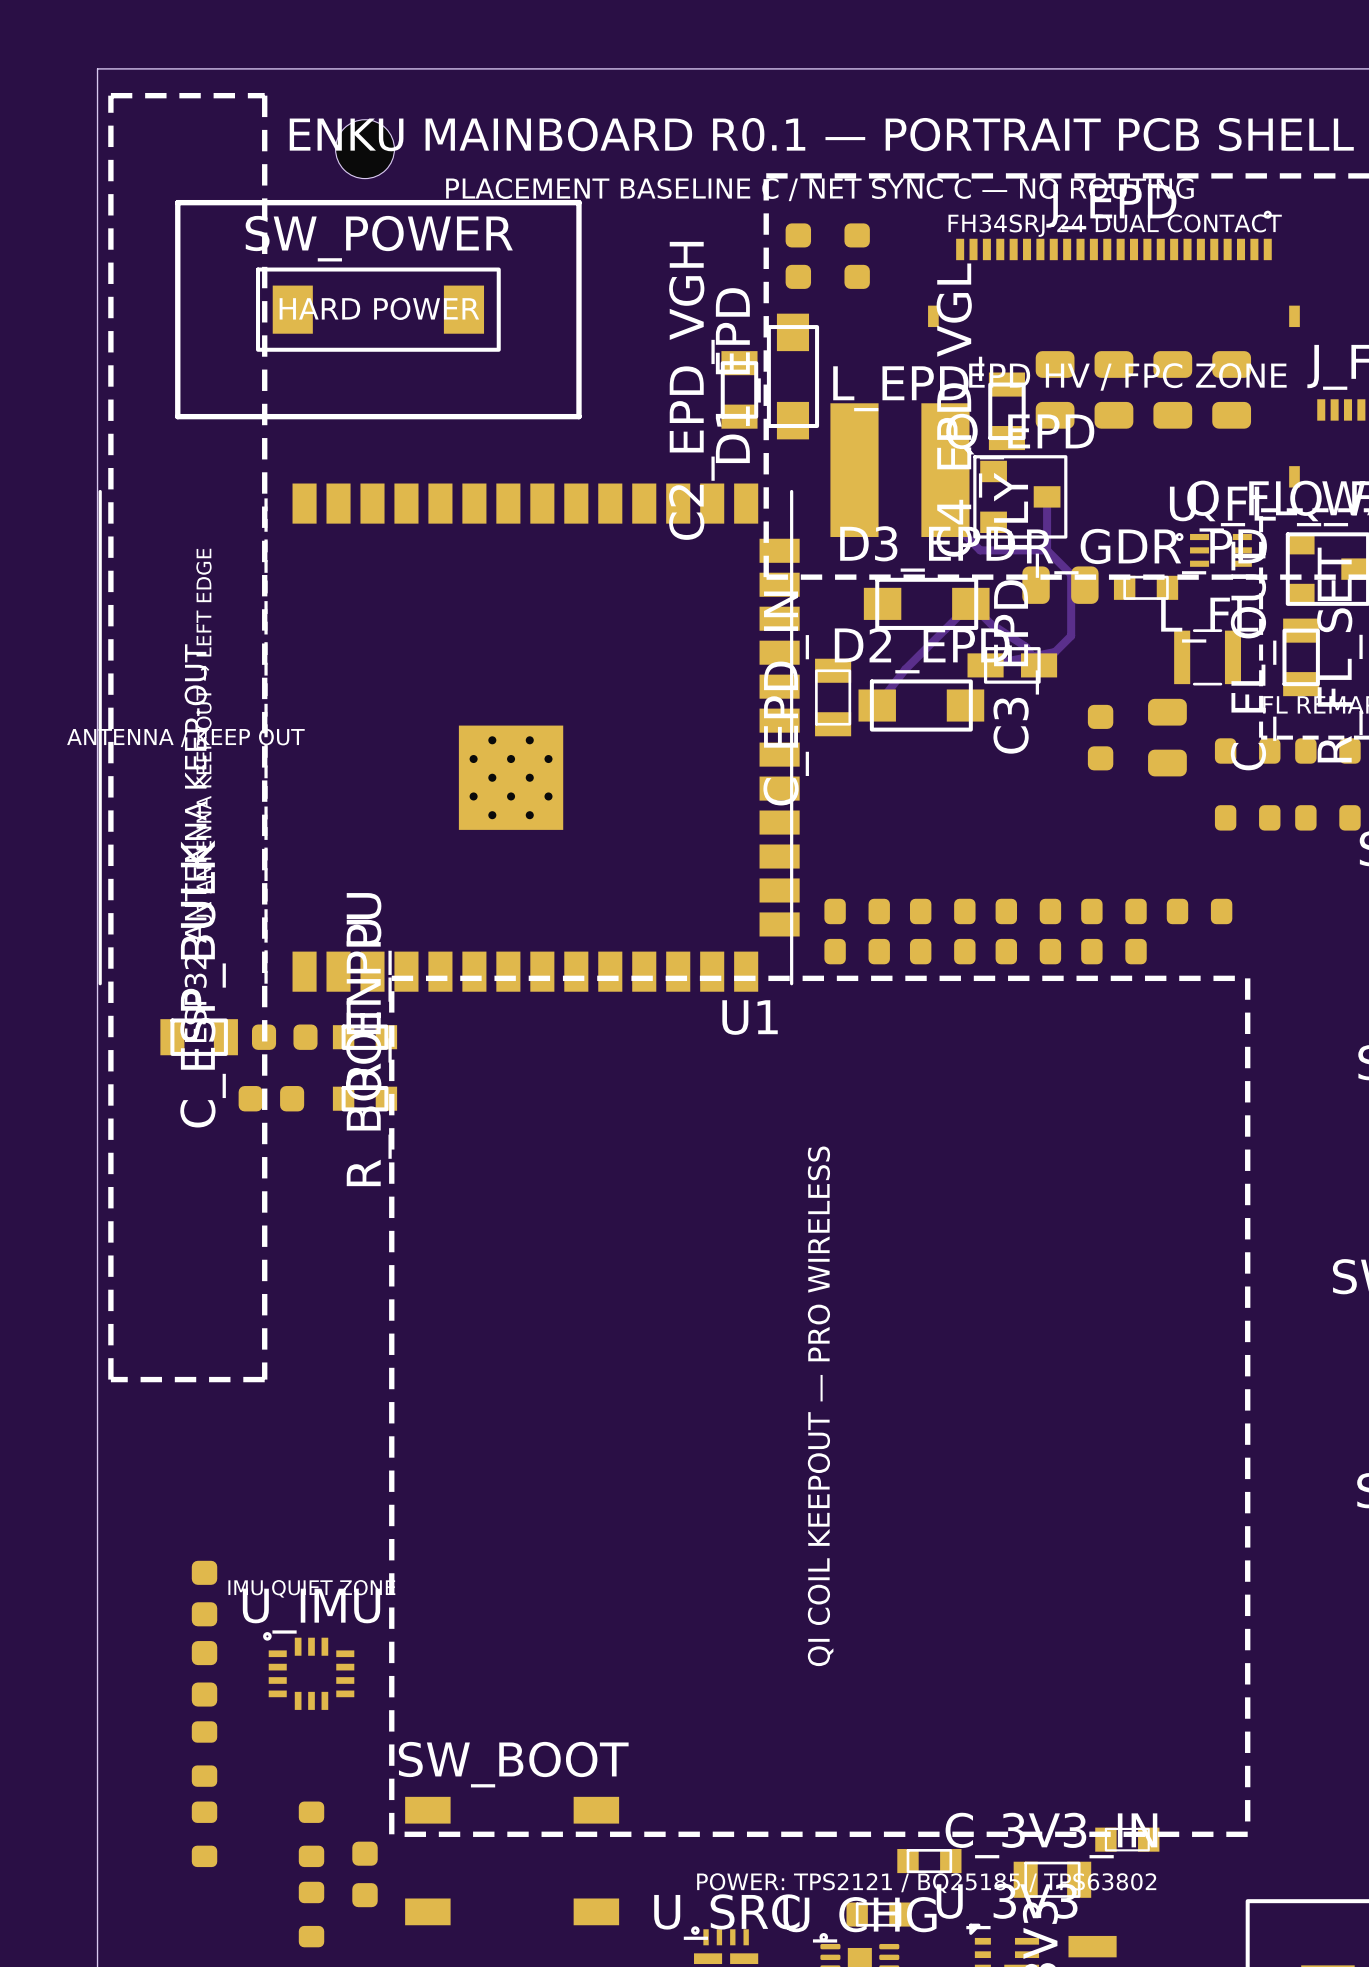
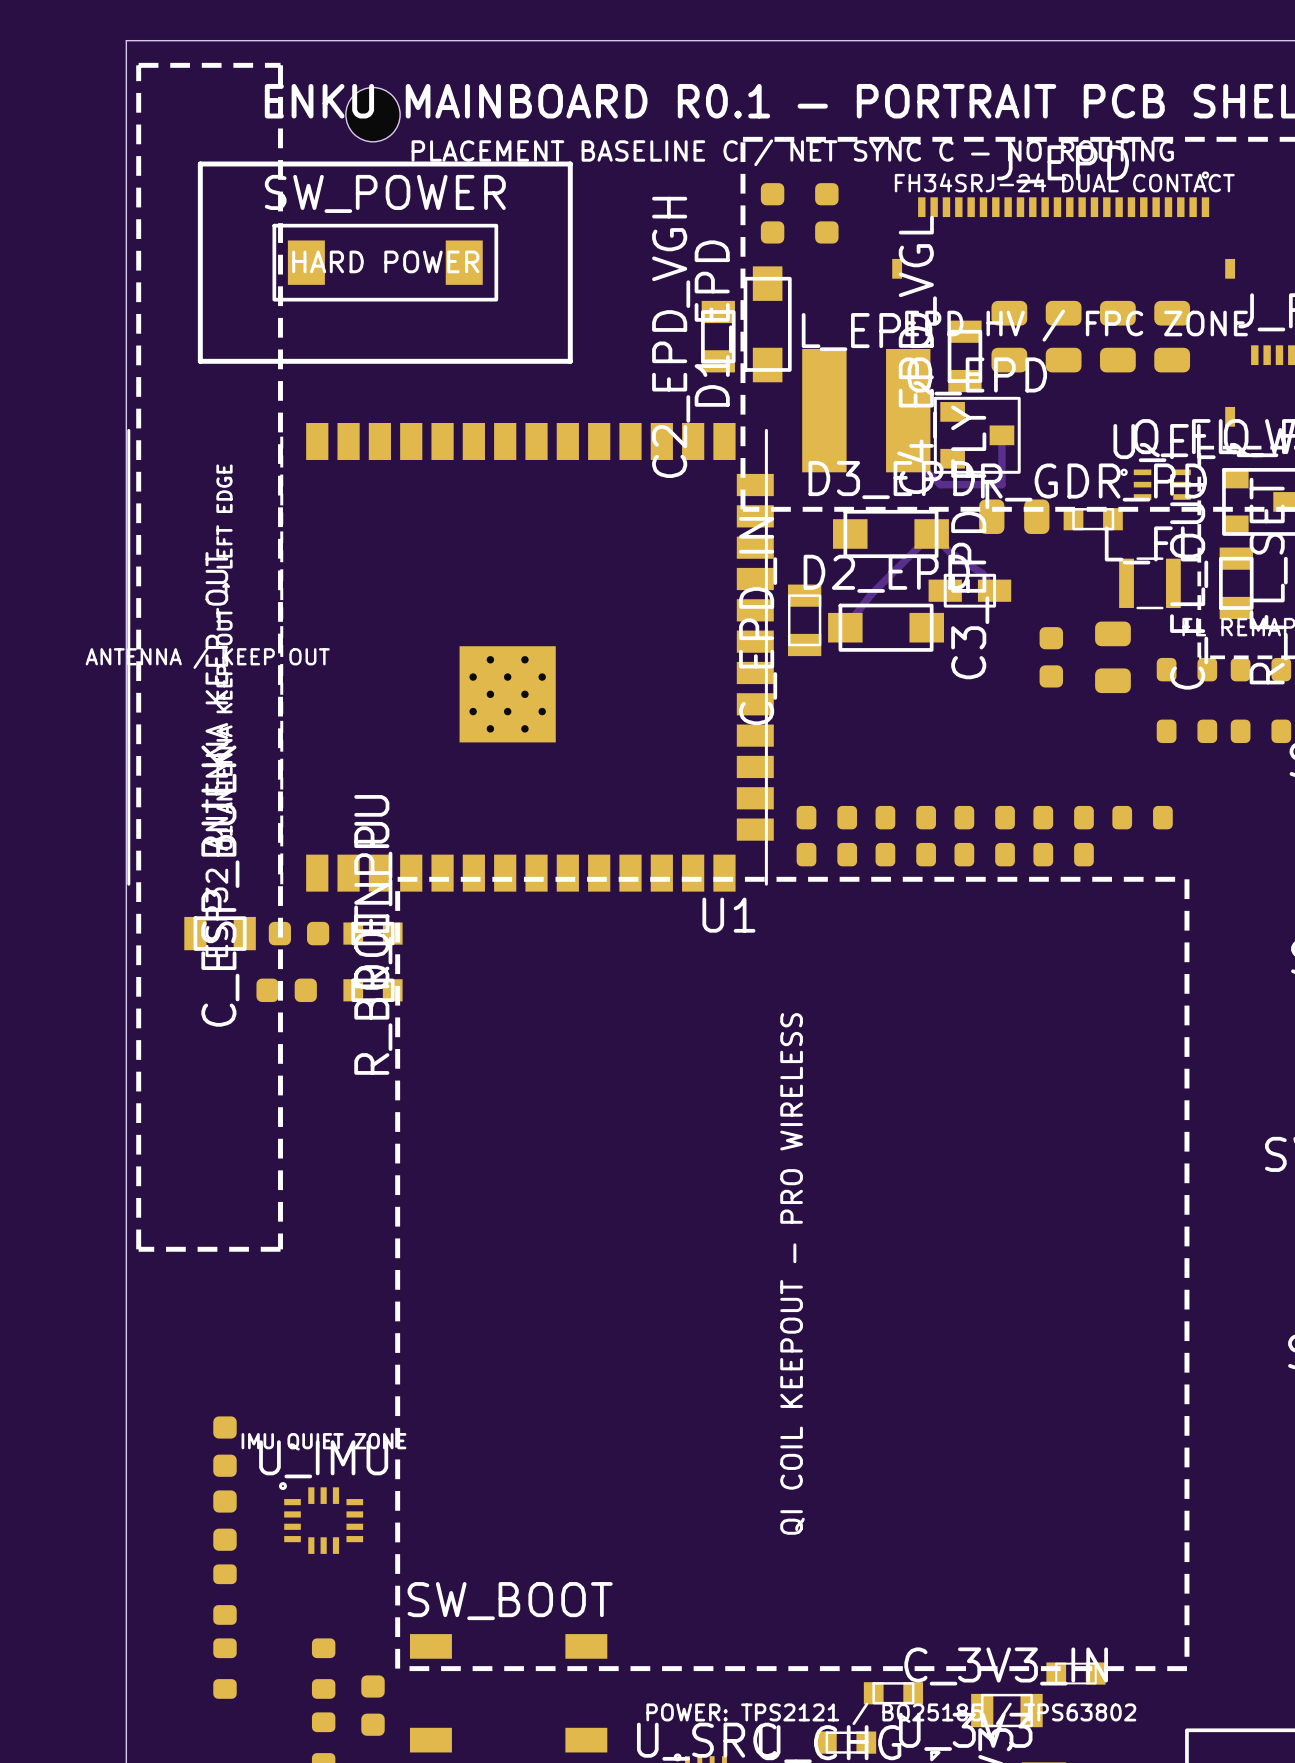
track: (1047, 550) (1071, 574) (1071, 635) (1055, 652) (985, 665) -> none

